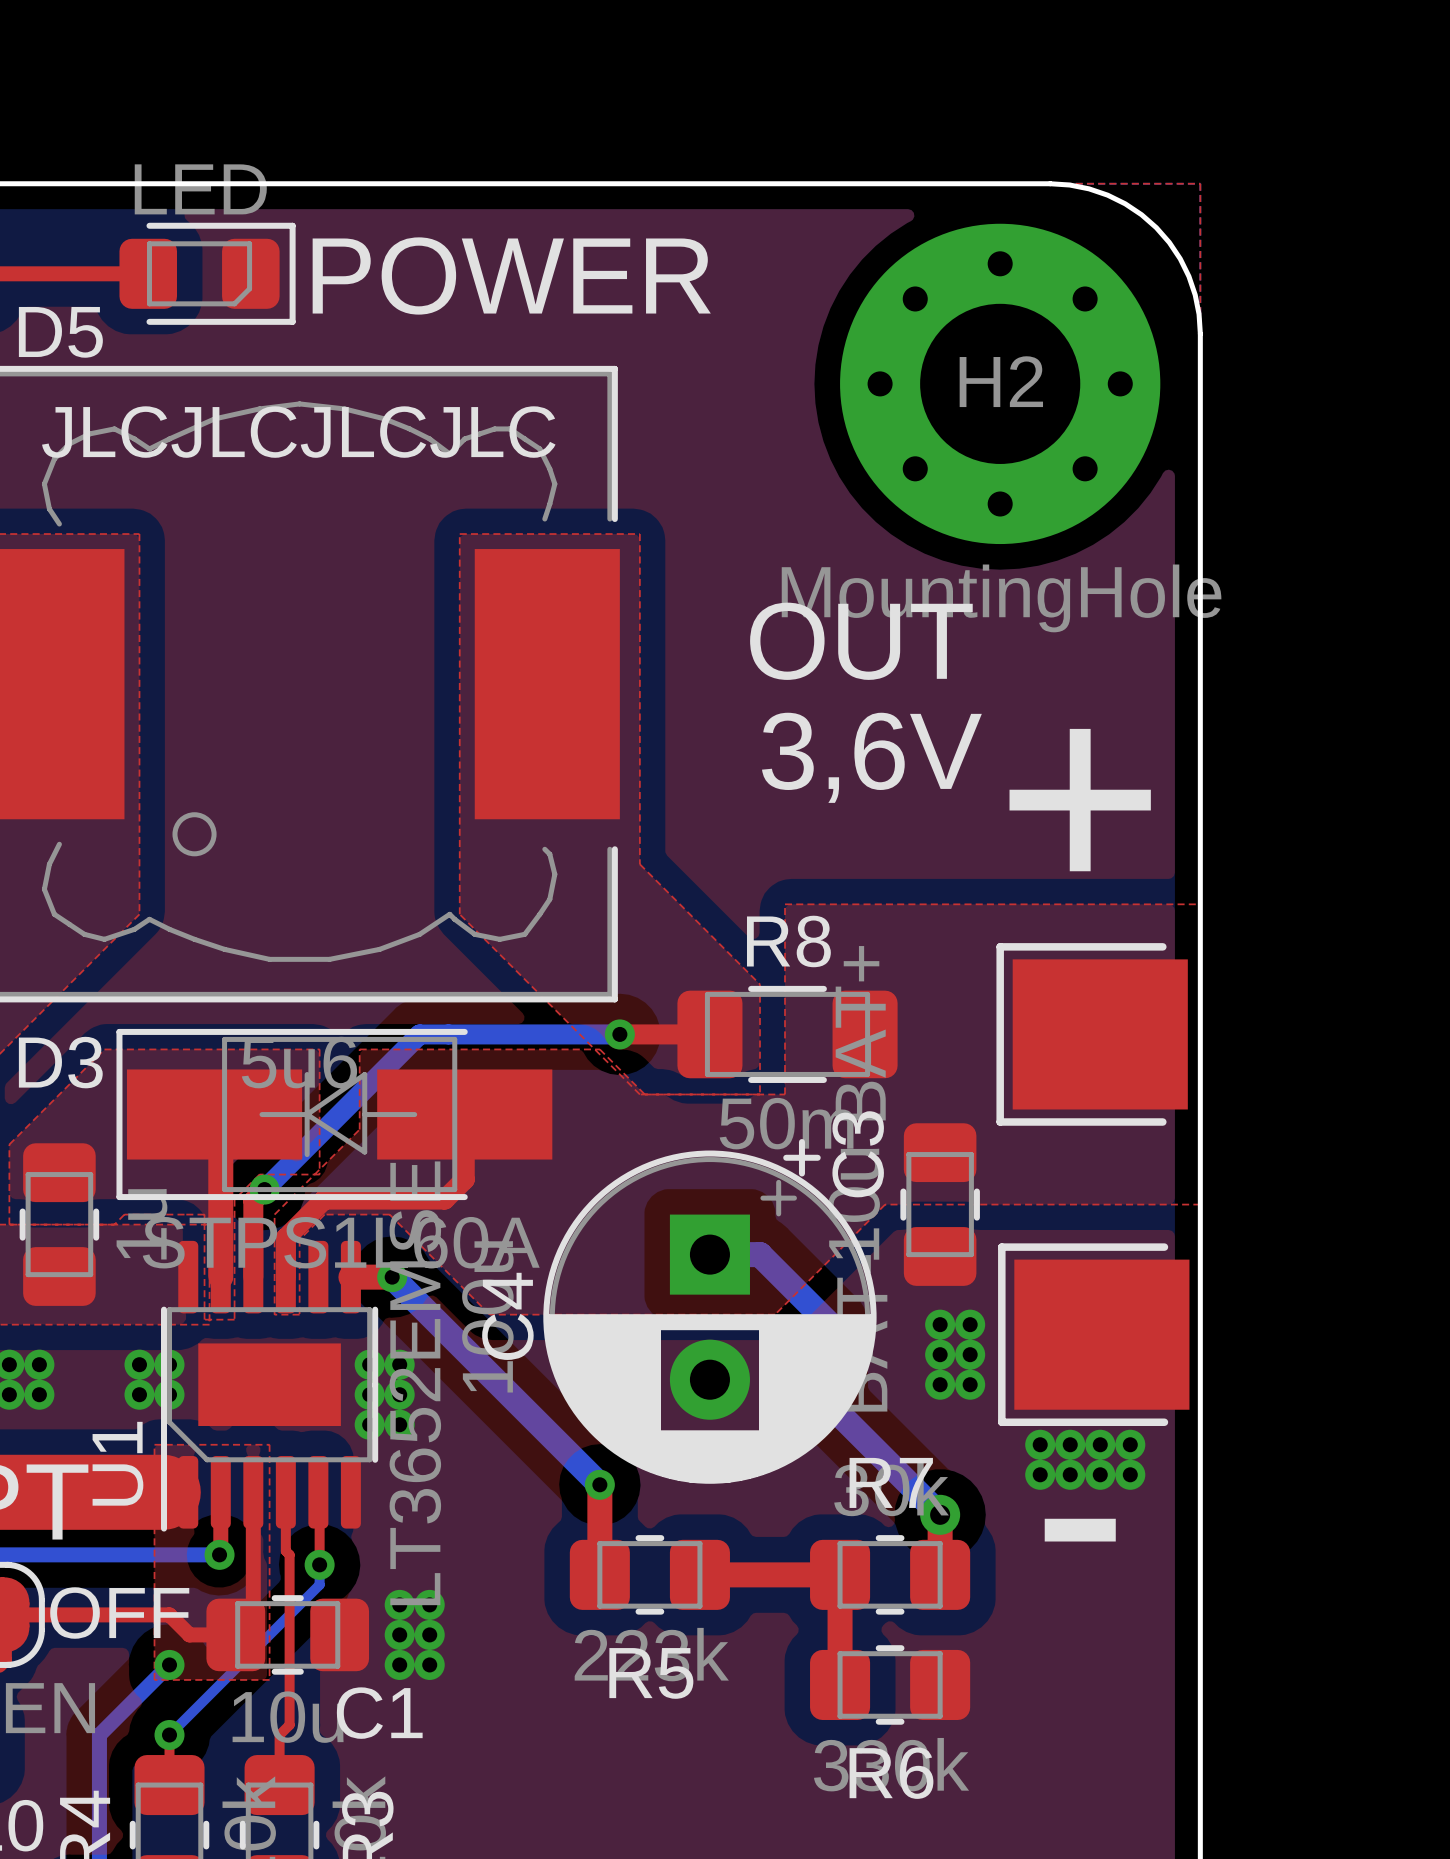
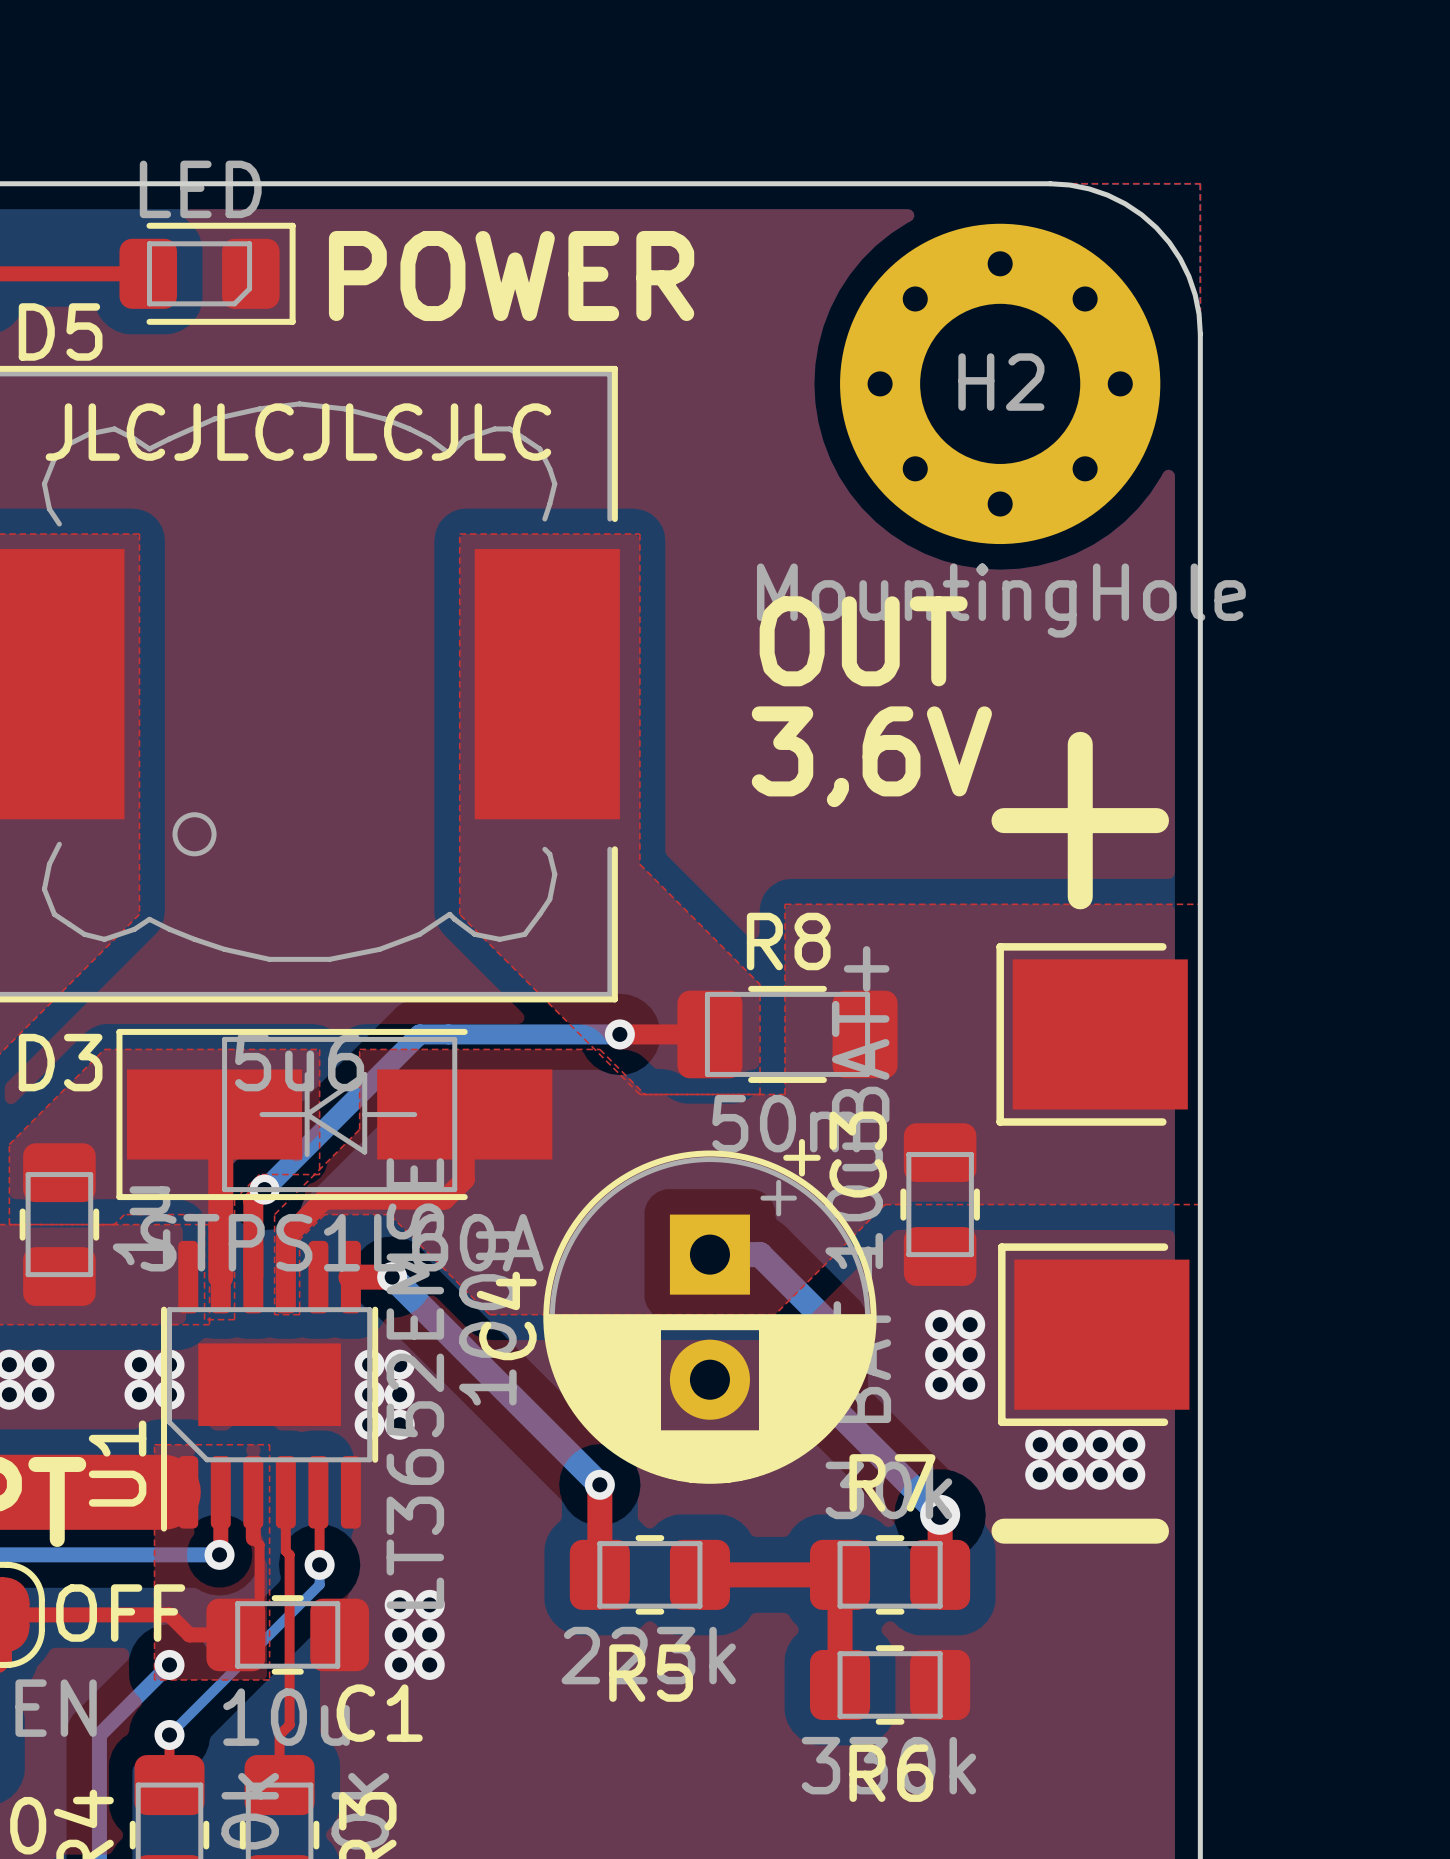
top track: (253, 1538) (253, 1617) -> (253, 1538) (259, 1544) (259, 1611) (235, 1634)

